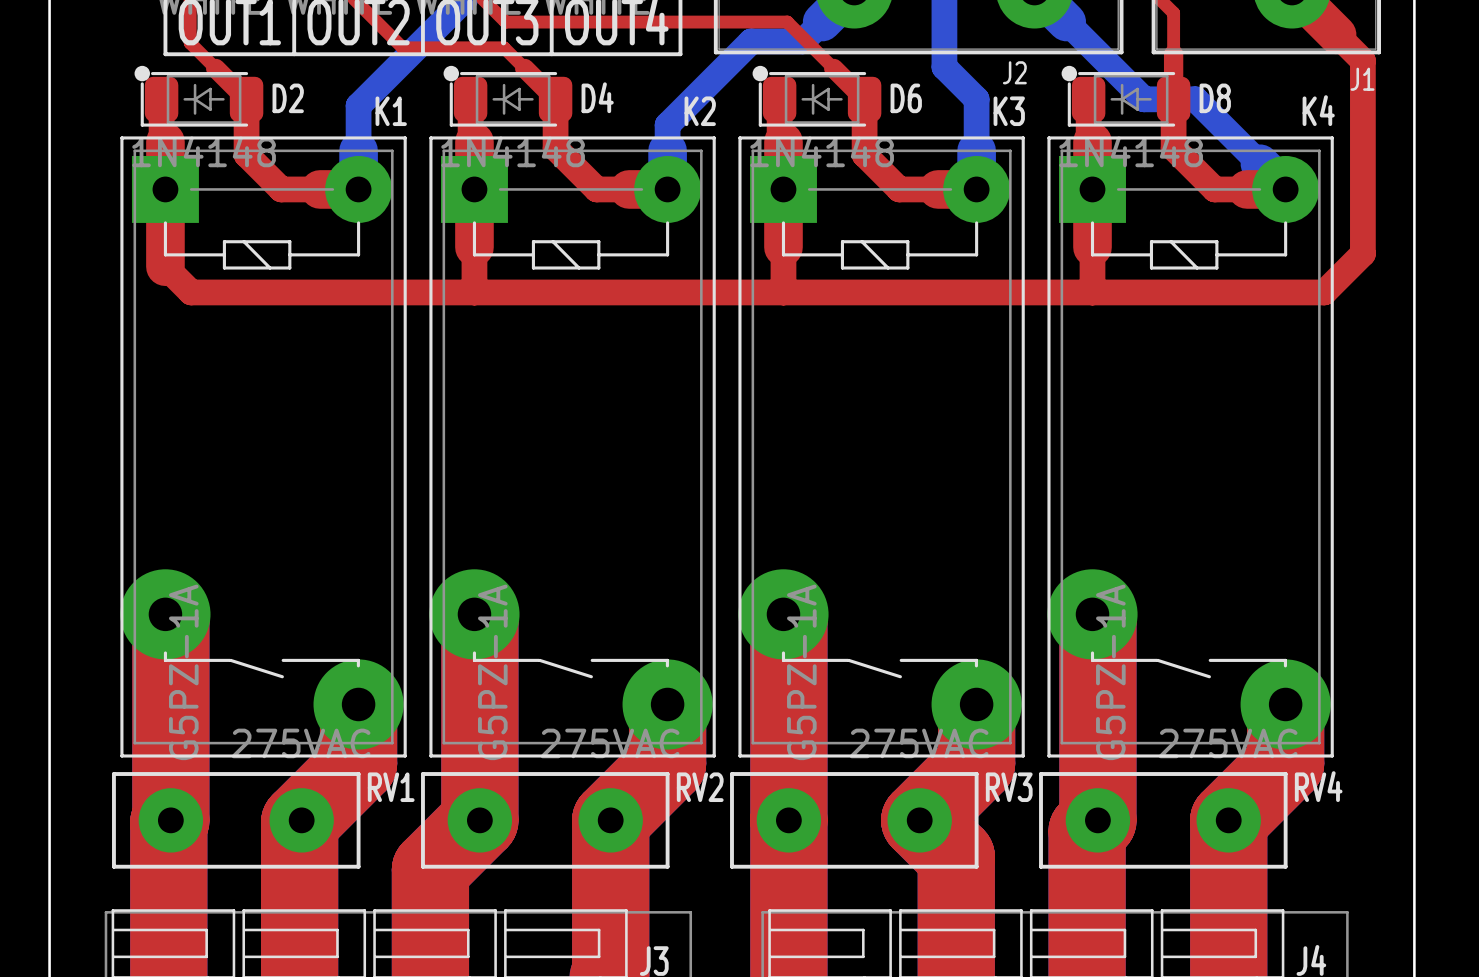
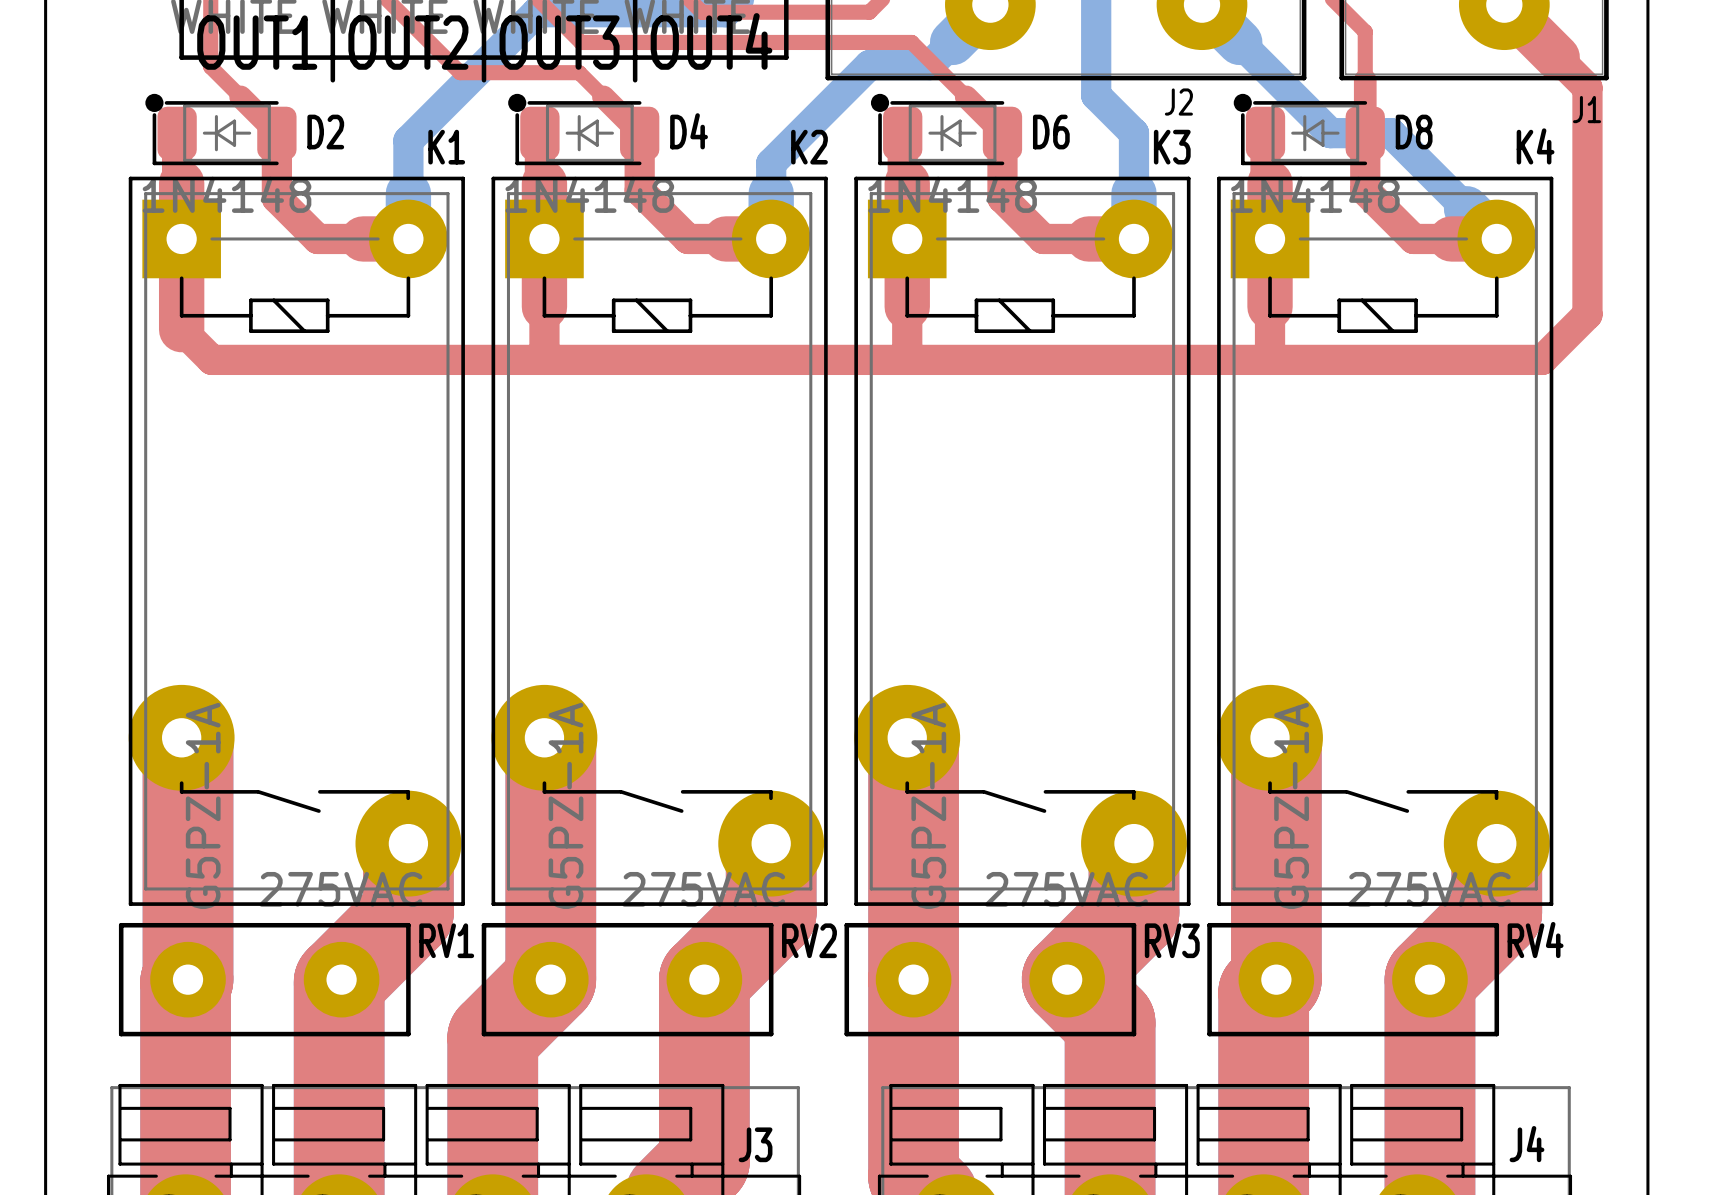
line: (165, 34) (165, 54) (680, 54) (680, 34) -> (181, 57) (786, 57)

